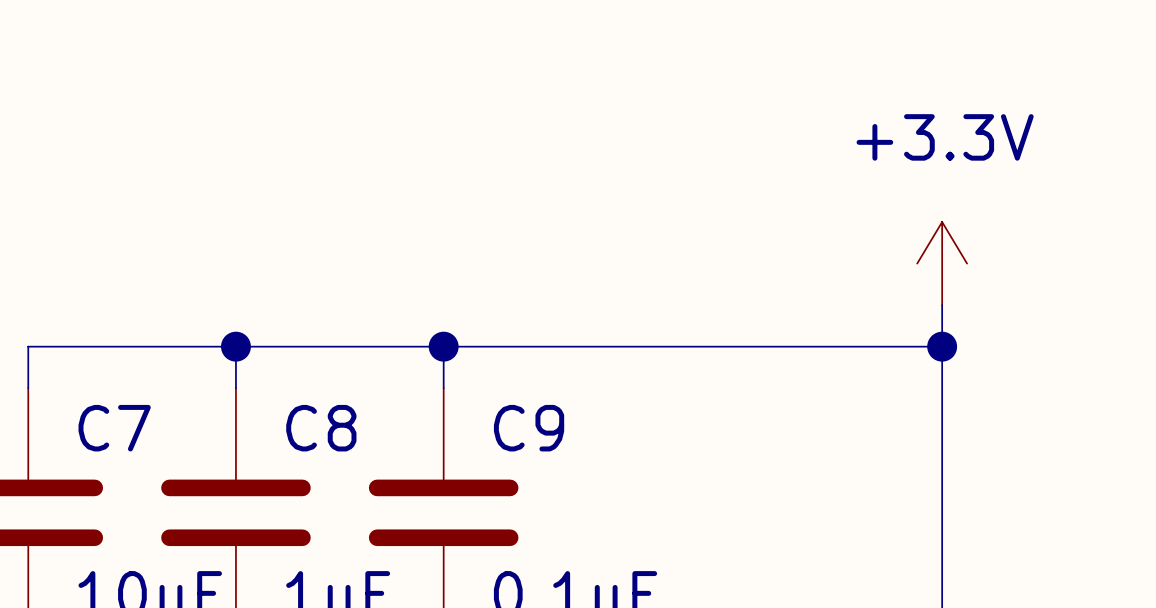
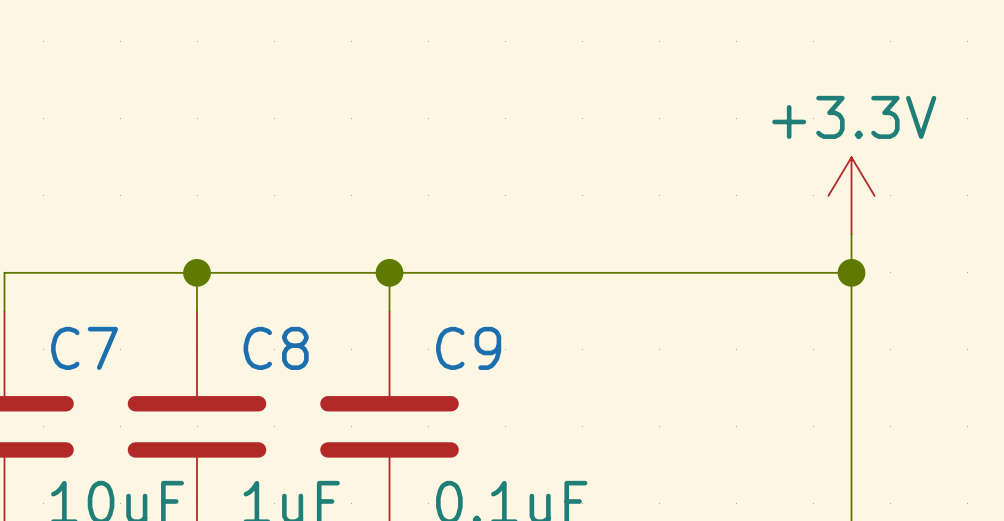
power symbol text position: +3.3V (945, 137) -> +3.3V (854, 117)

